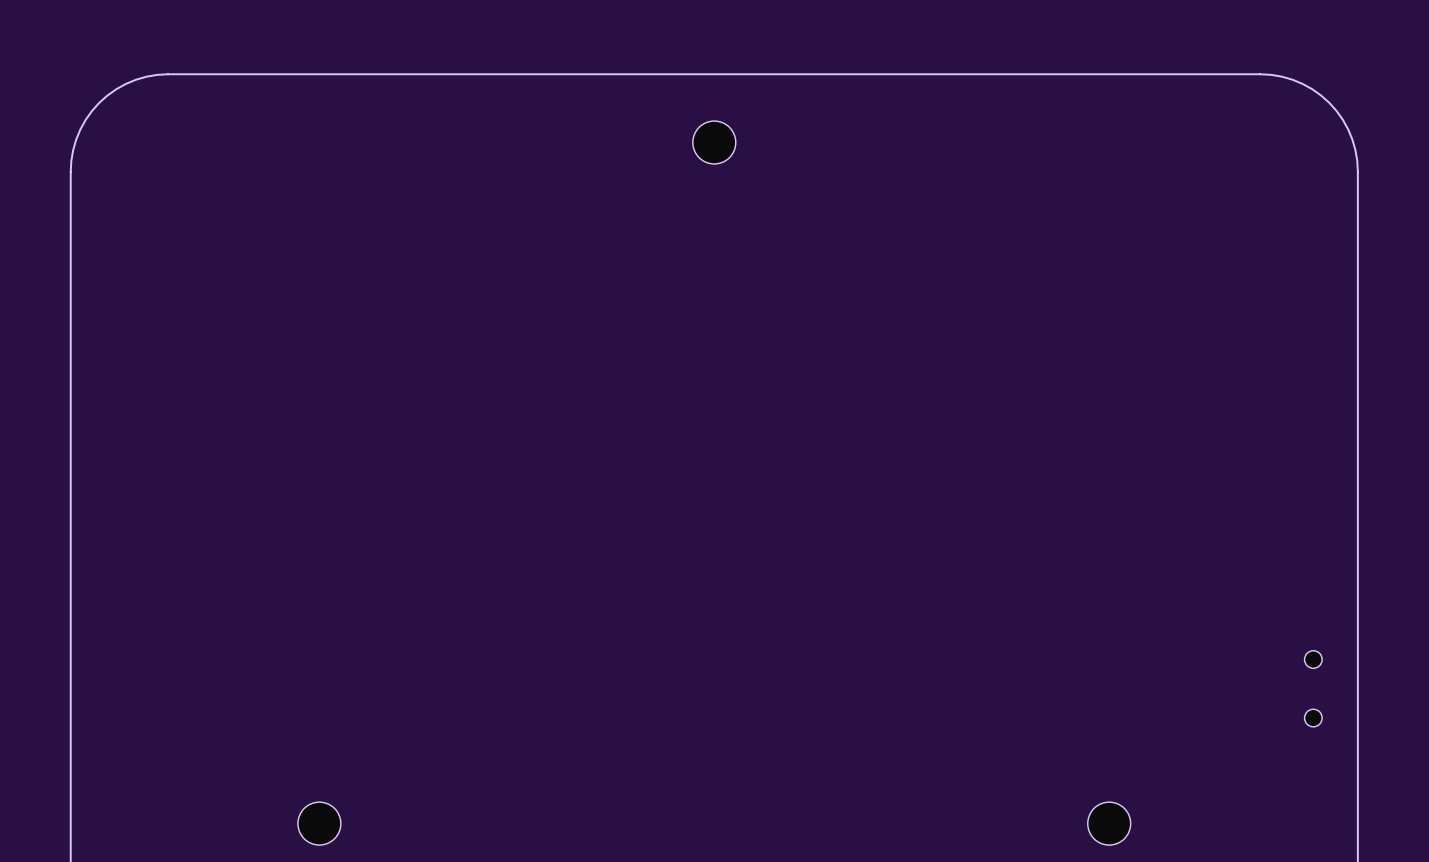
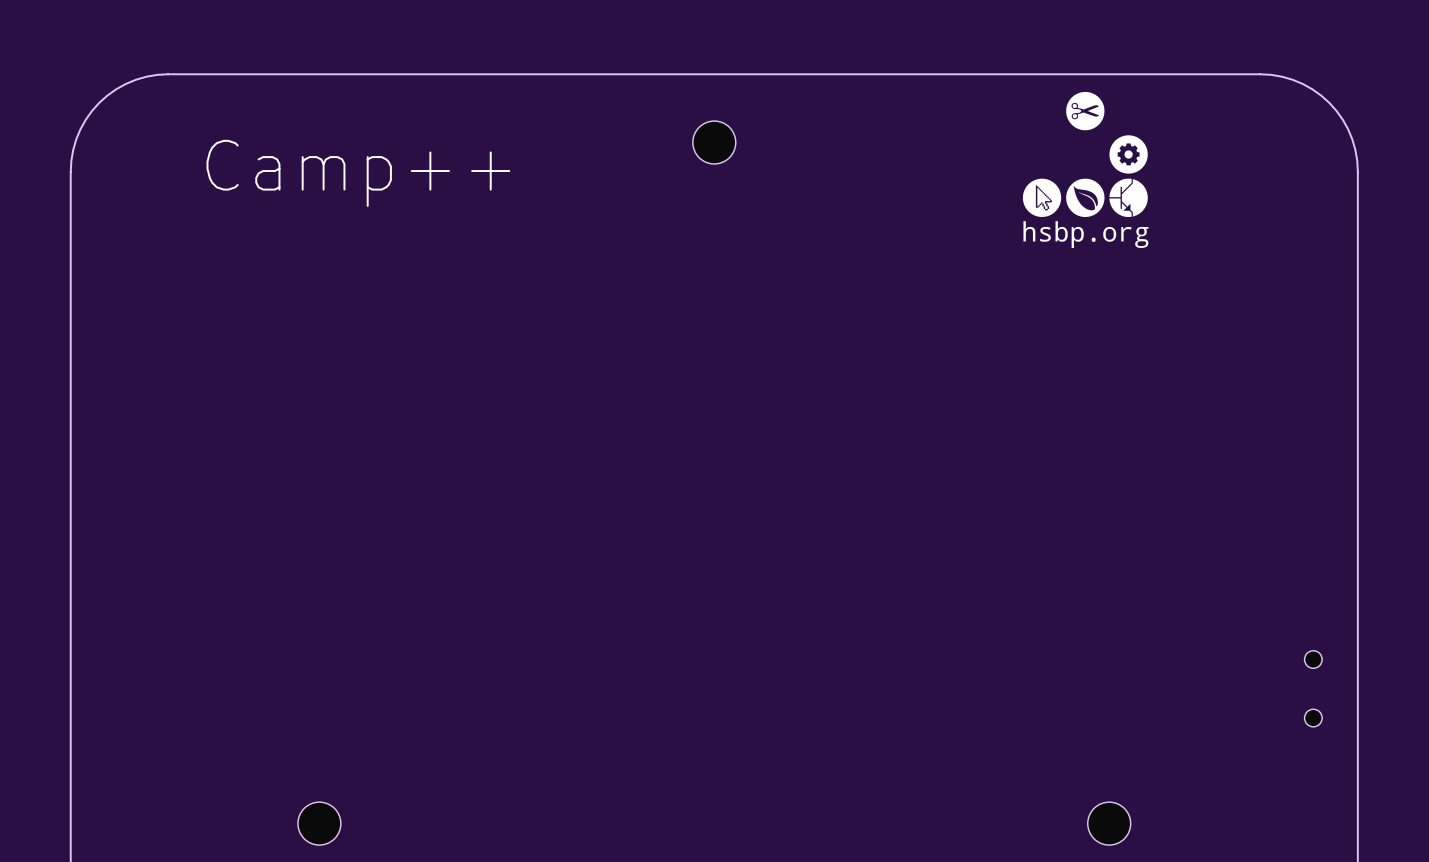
drawing: none -> [1022, 91, 1149, 248]
text: none -> Camp++ (358, 173)

